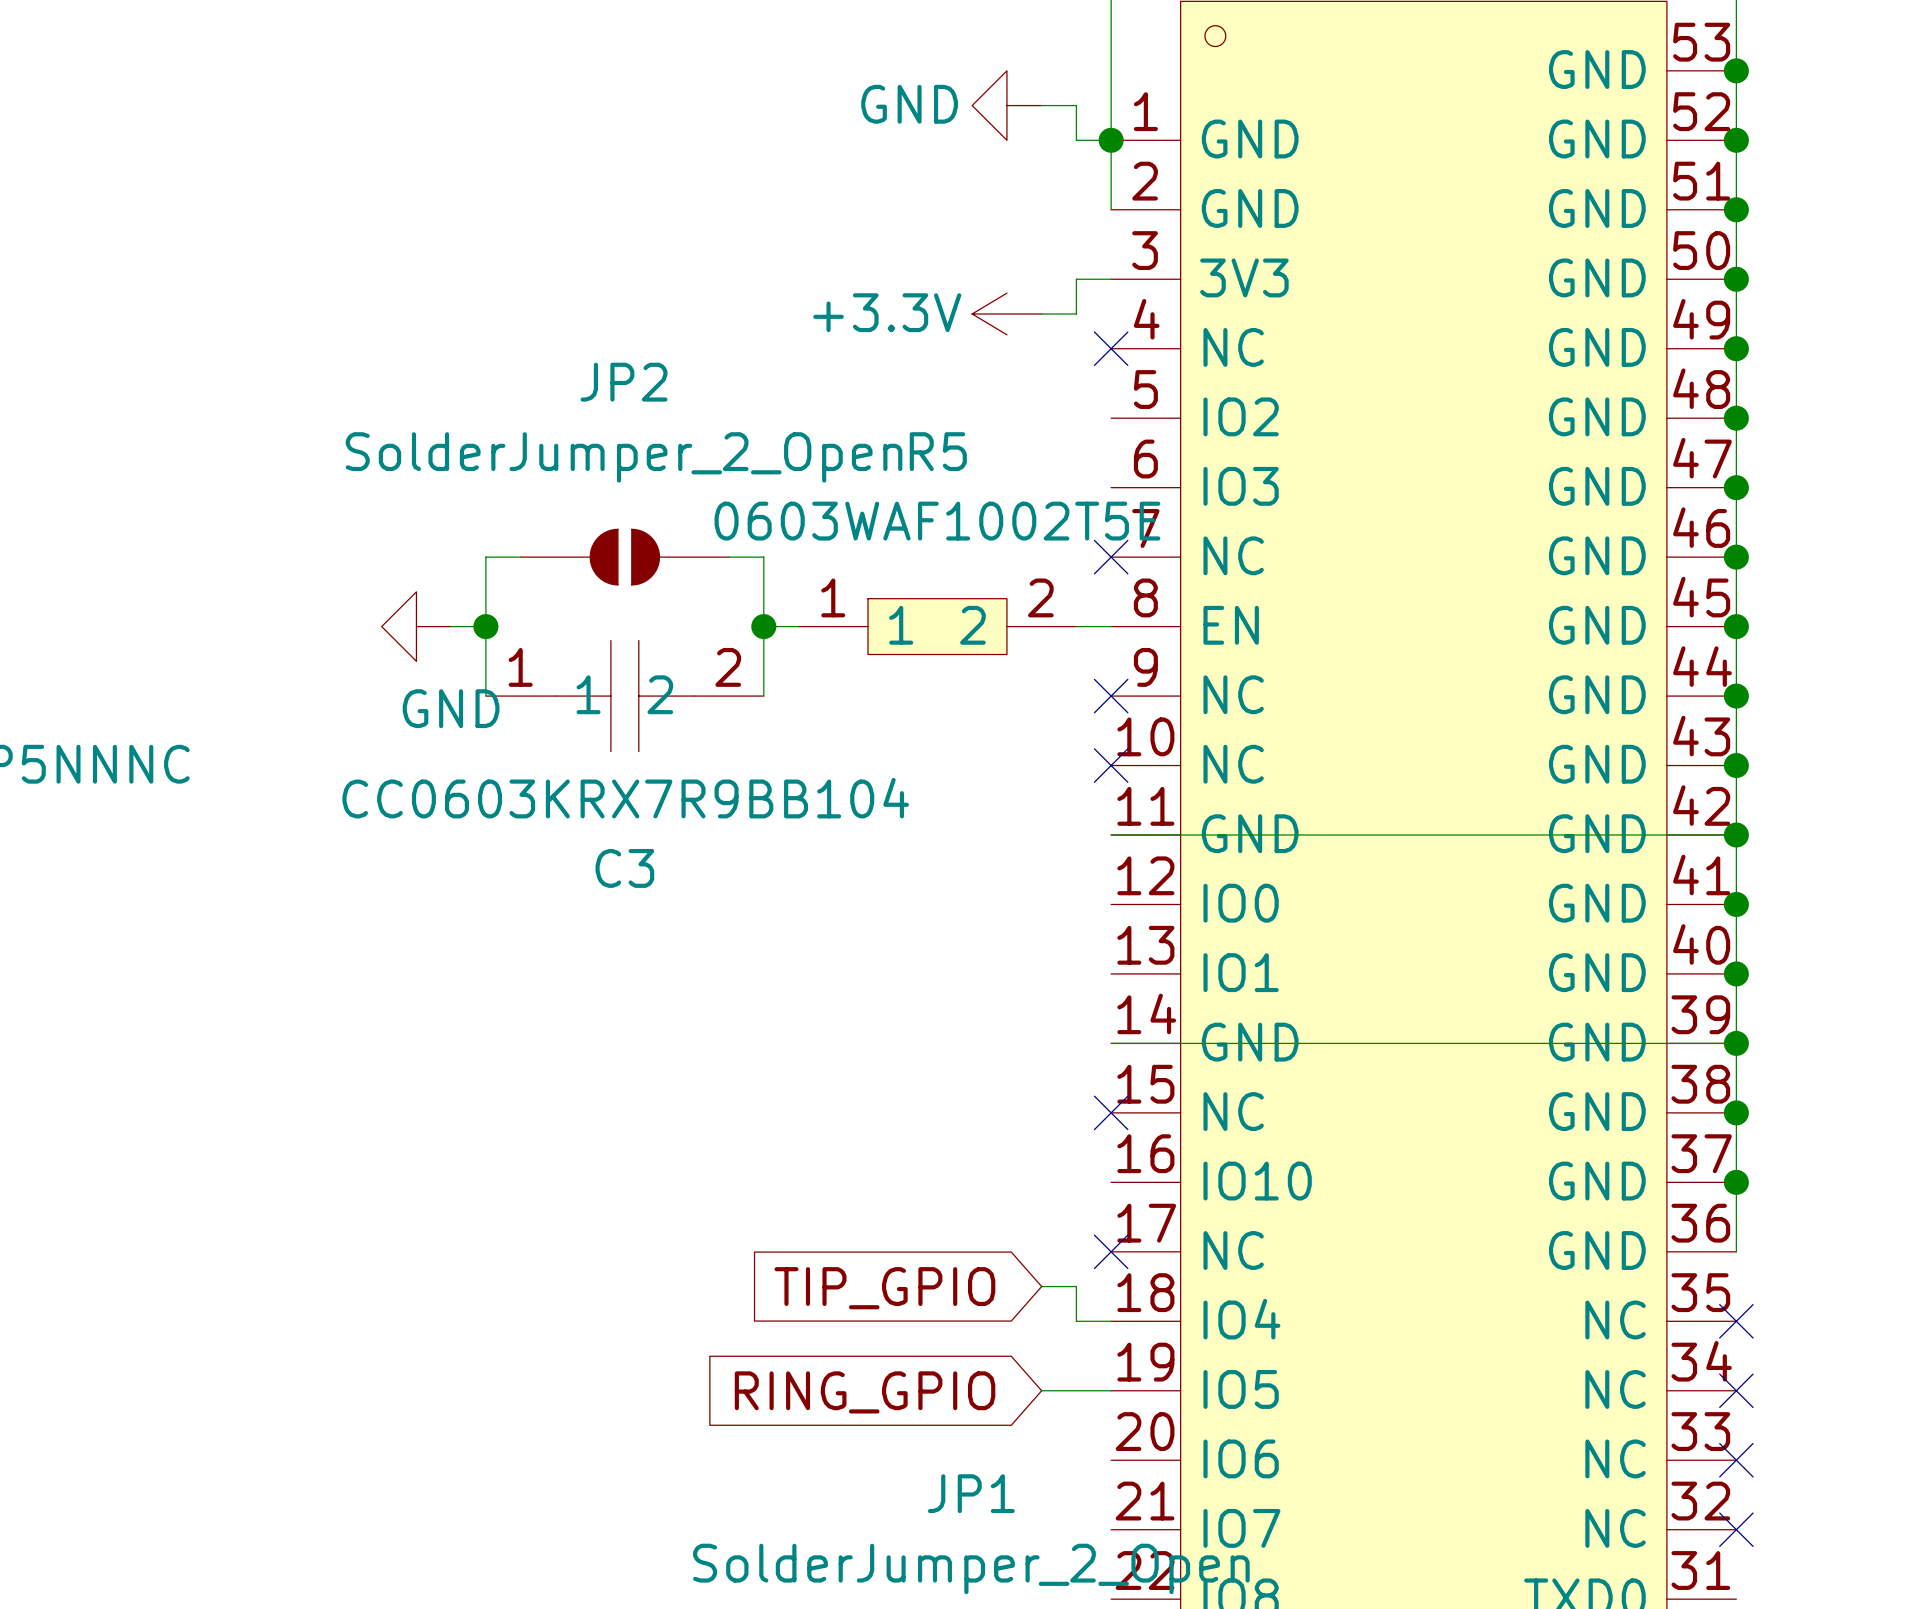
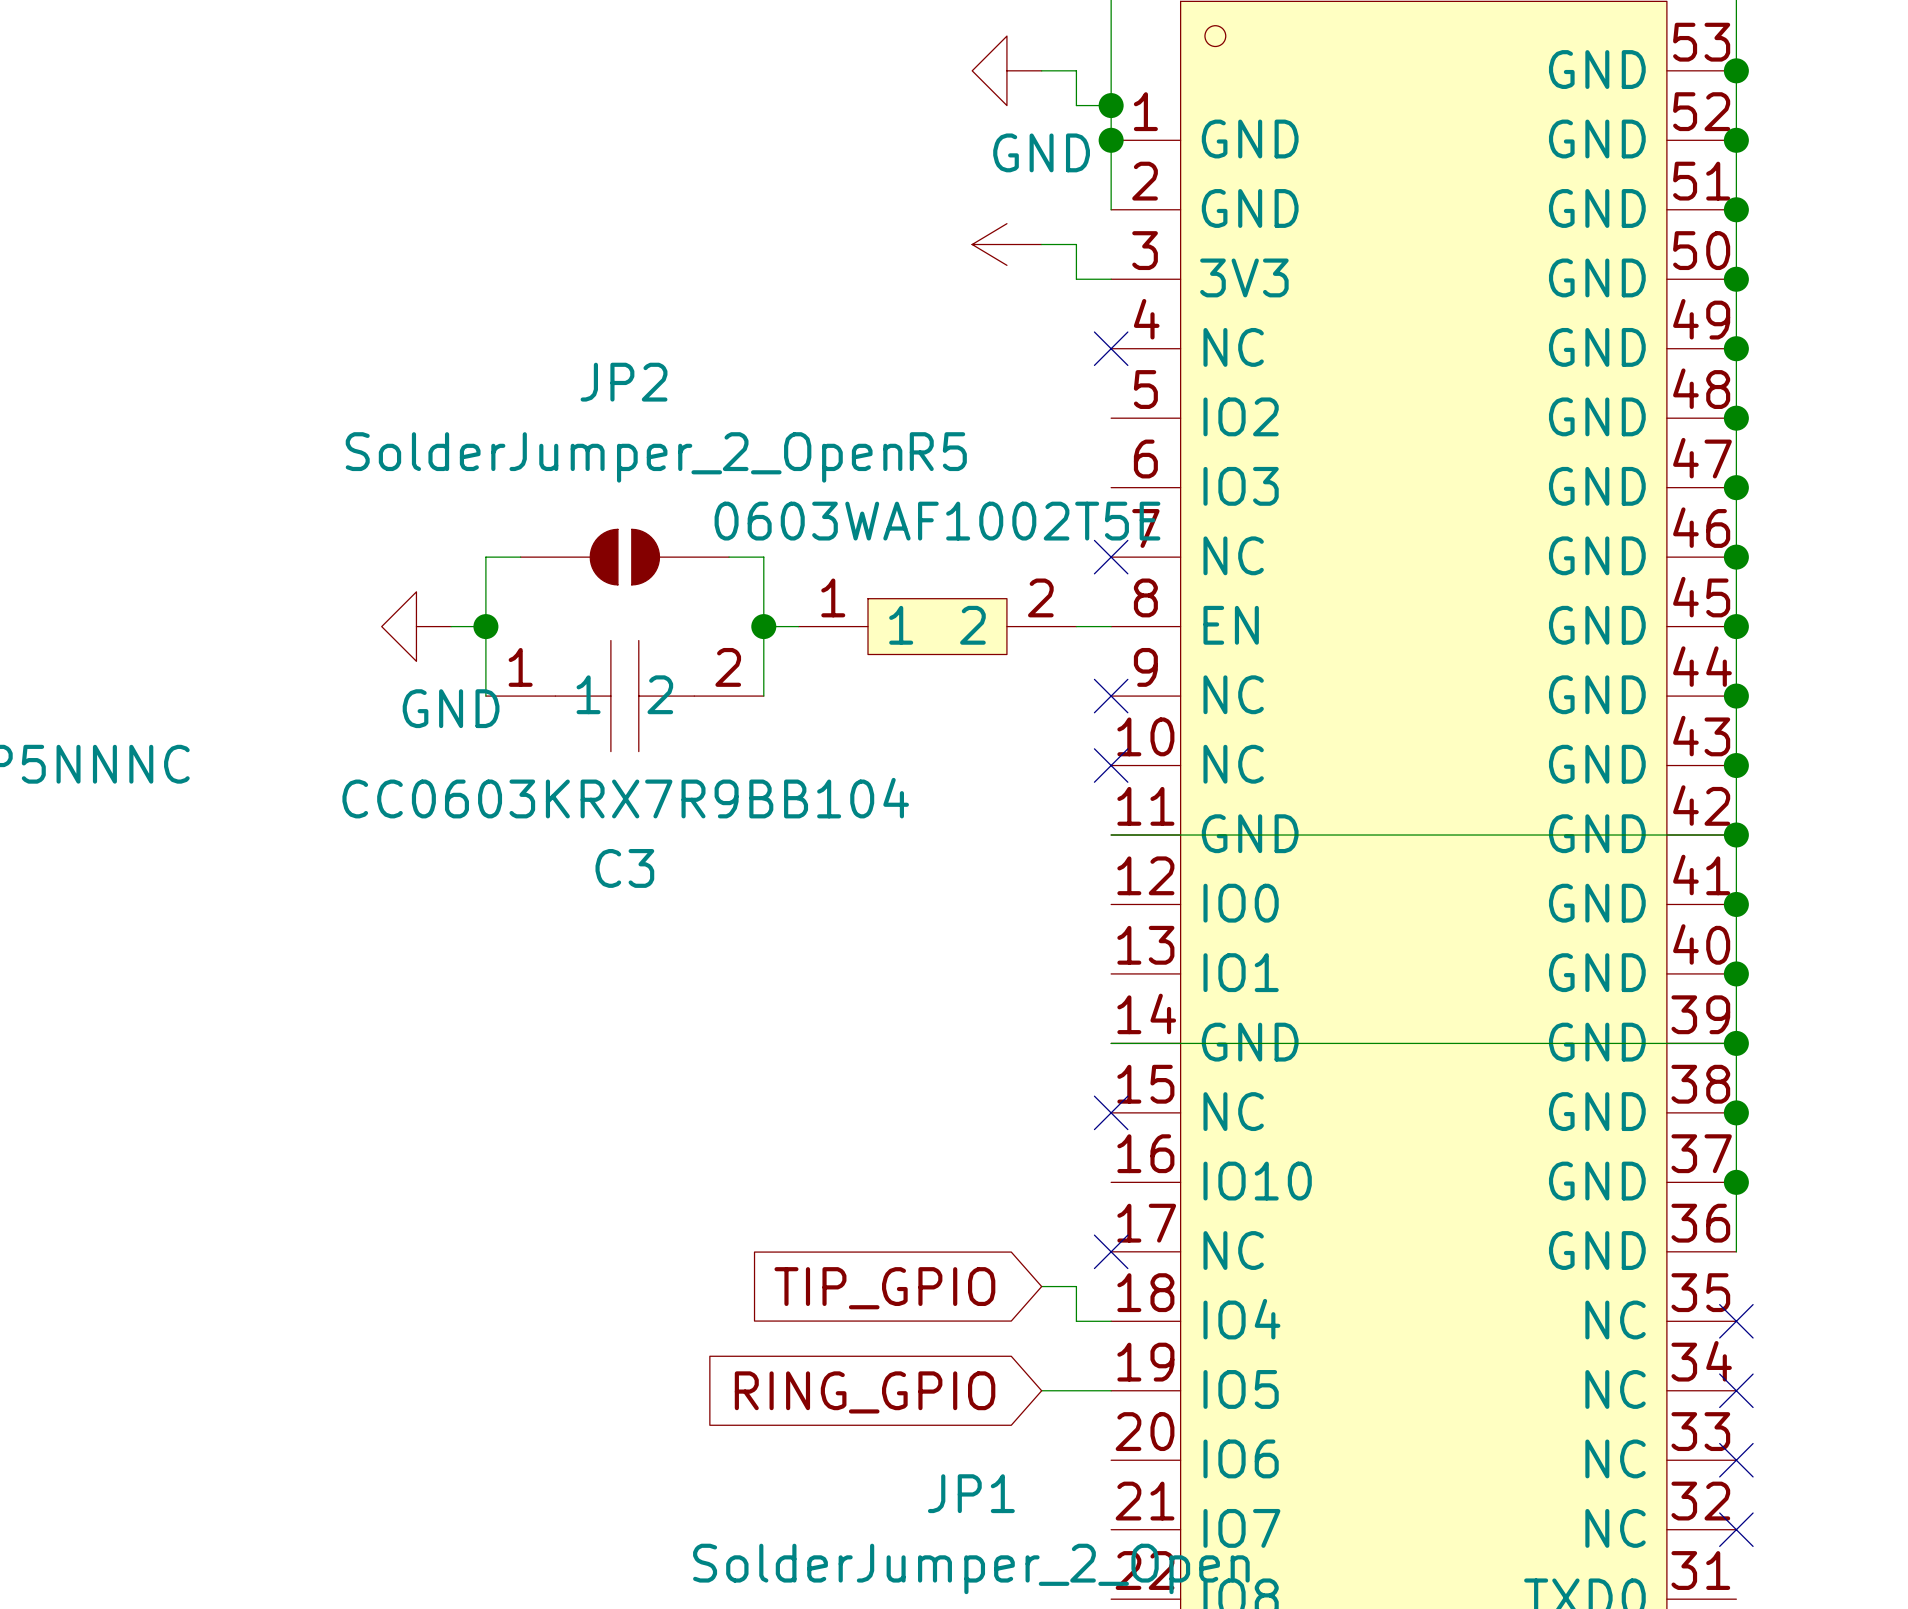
power symbol text position: GND (909, 104) -> GND (1041, 152)
power symbol position: GND (1006, 105) -> GND (1006, 70)
wire: (1041, 105) (1076, 105) (1076, 140) (1111, 140) -> (1041, 70) (1076, 70) (1076, 105) (1111, 105)
junction: none -> (1111, 105)
power symbol: none -> (1006, 244)
wire: (1076, 279) (1076, 313) (1041, 313) -> (1076, 279) (1076, 244) (1041, 244)
power symbol: +3.3V (1006, 313) -> none

